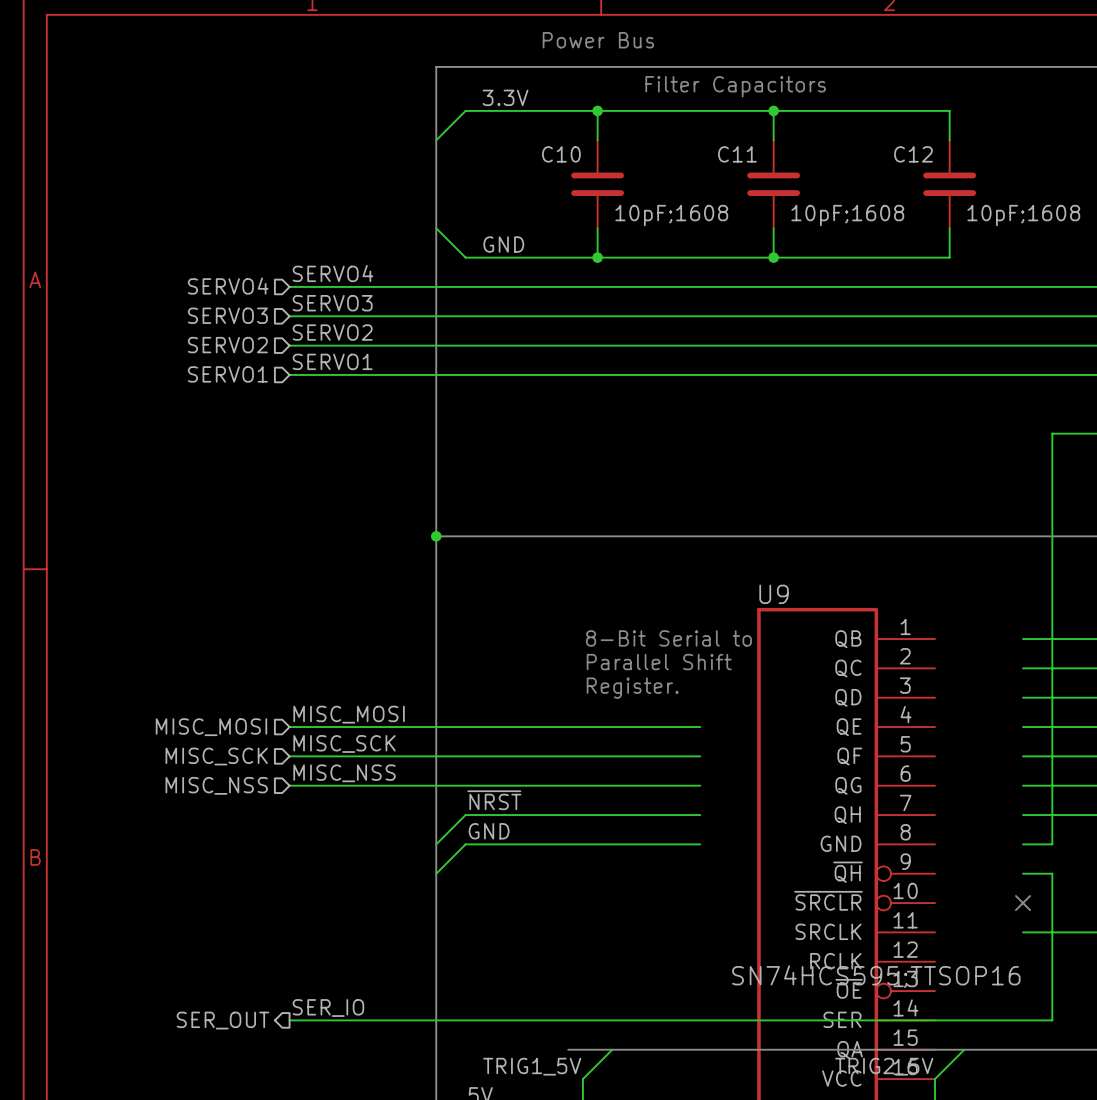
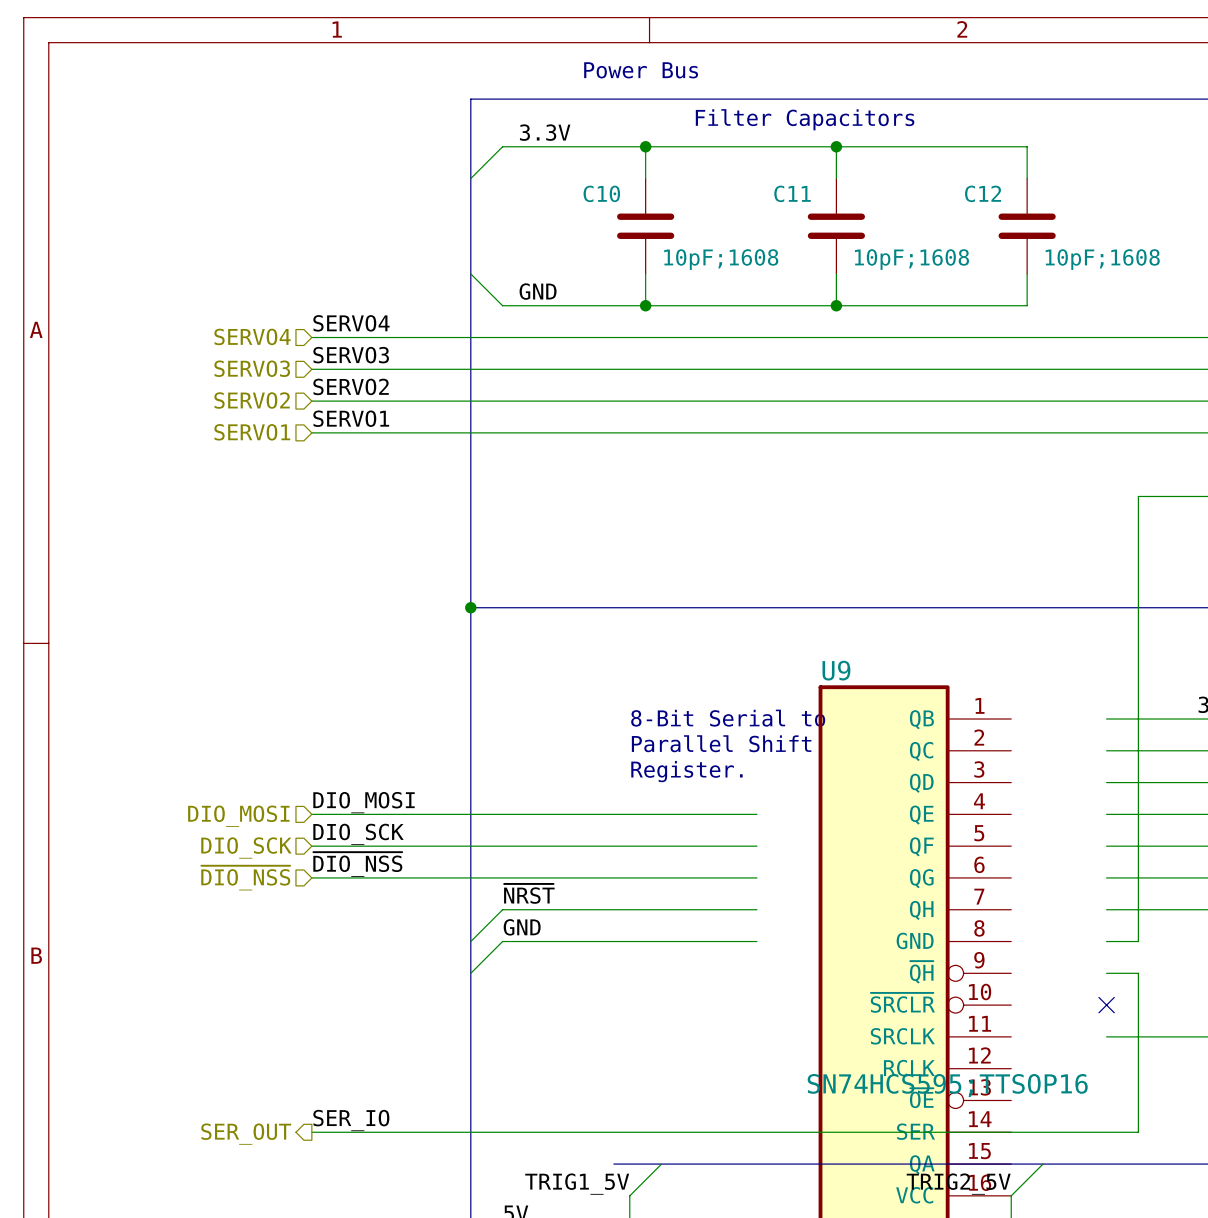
label: MISC_MOSI (349, 714) -> DIO_MOSI (364, 802)
hierarchical label: MISC_MOSI (211, 727) -> DIO_MOSI (238, 816)
label: MISC_SCK (344, 743) -> DIO_SCK (358, 834)
hierarchical label: MISC_SCK (216, 756) -> DIO_SCK (246, 847)
label: MISC_NSS (344, 773) -> ~{DIO_NSS} (357, 864)
hierarchical label: MISC_NSS (216, 785) -> ~{DIO_NSS} (245, 878)

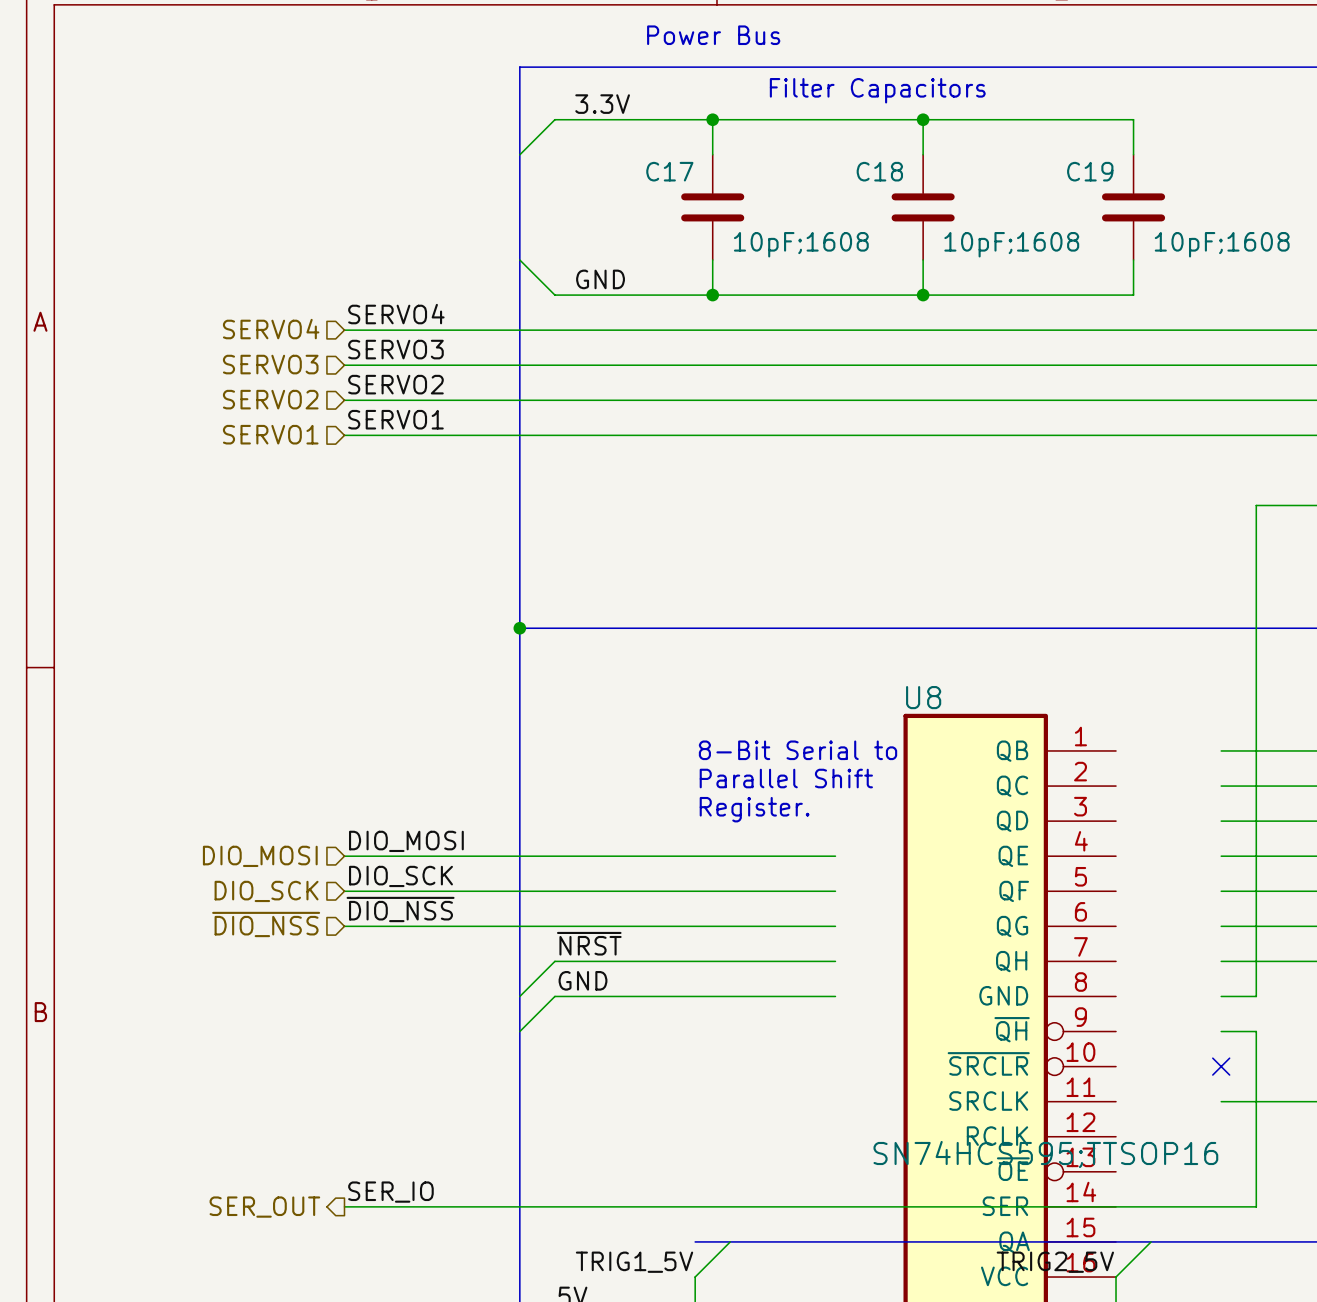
C10 name: C10 (601, 193) -> C17 (669, 171)
C11 name: C11 (792, 193) -> C18 (879, 171)
C12 name: C12 (983, 193) -> C19 (1090, 171)
U9 name: U9 (836, 670) -> U8 (923, 697)
bus: (613, 1164) (629, 1164) -> none

